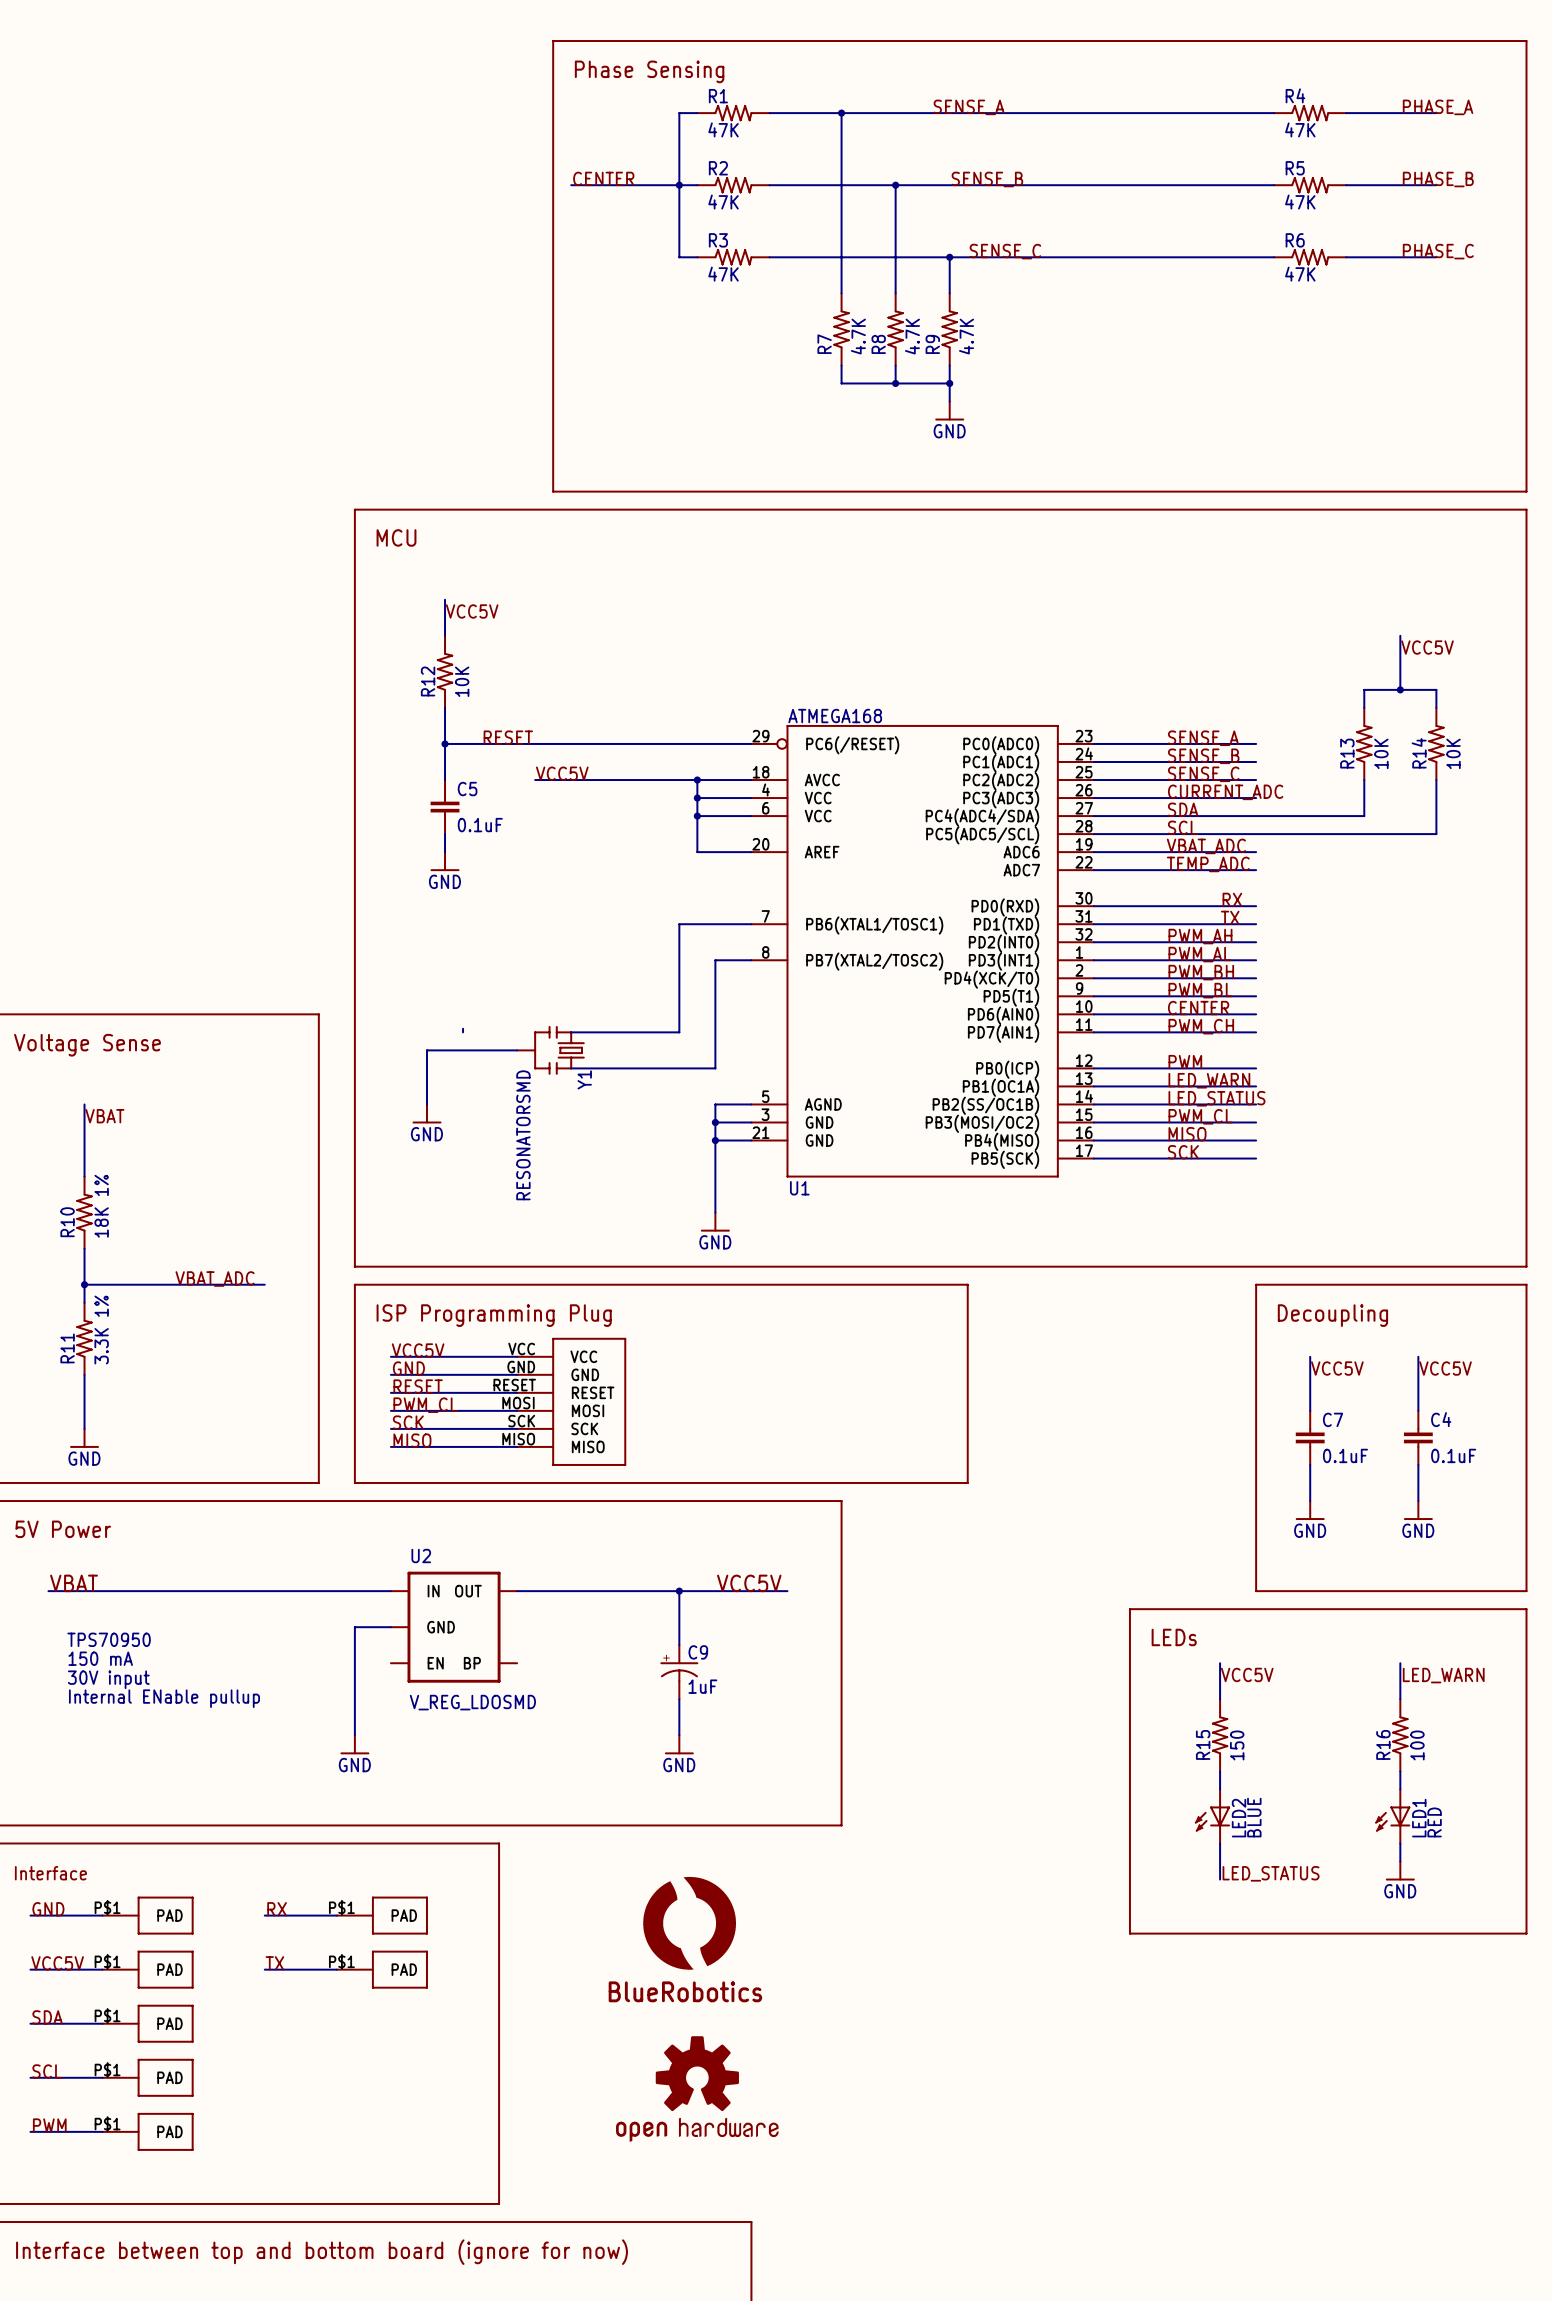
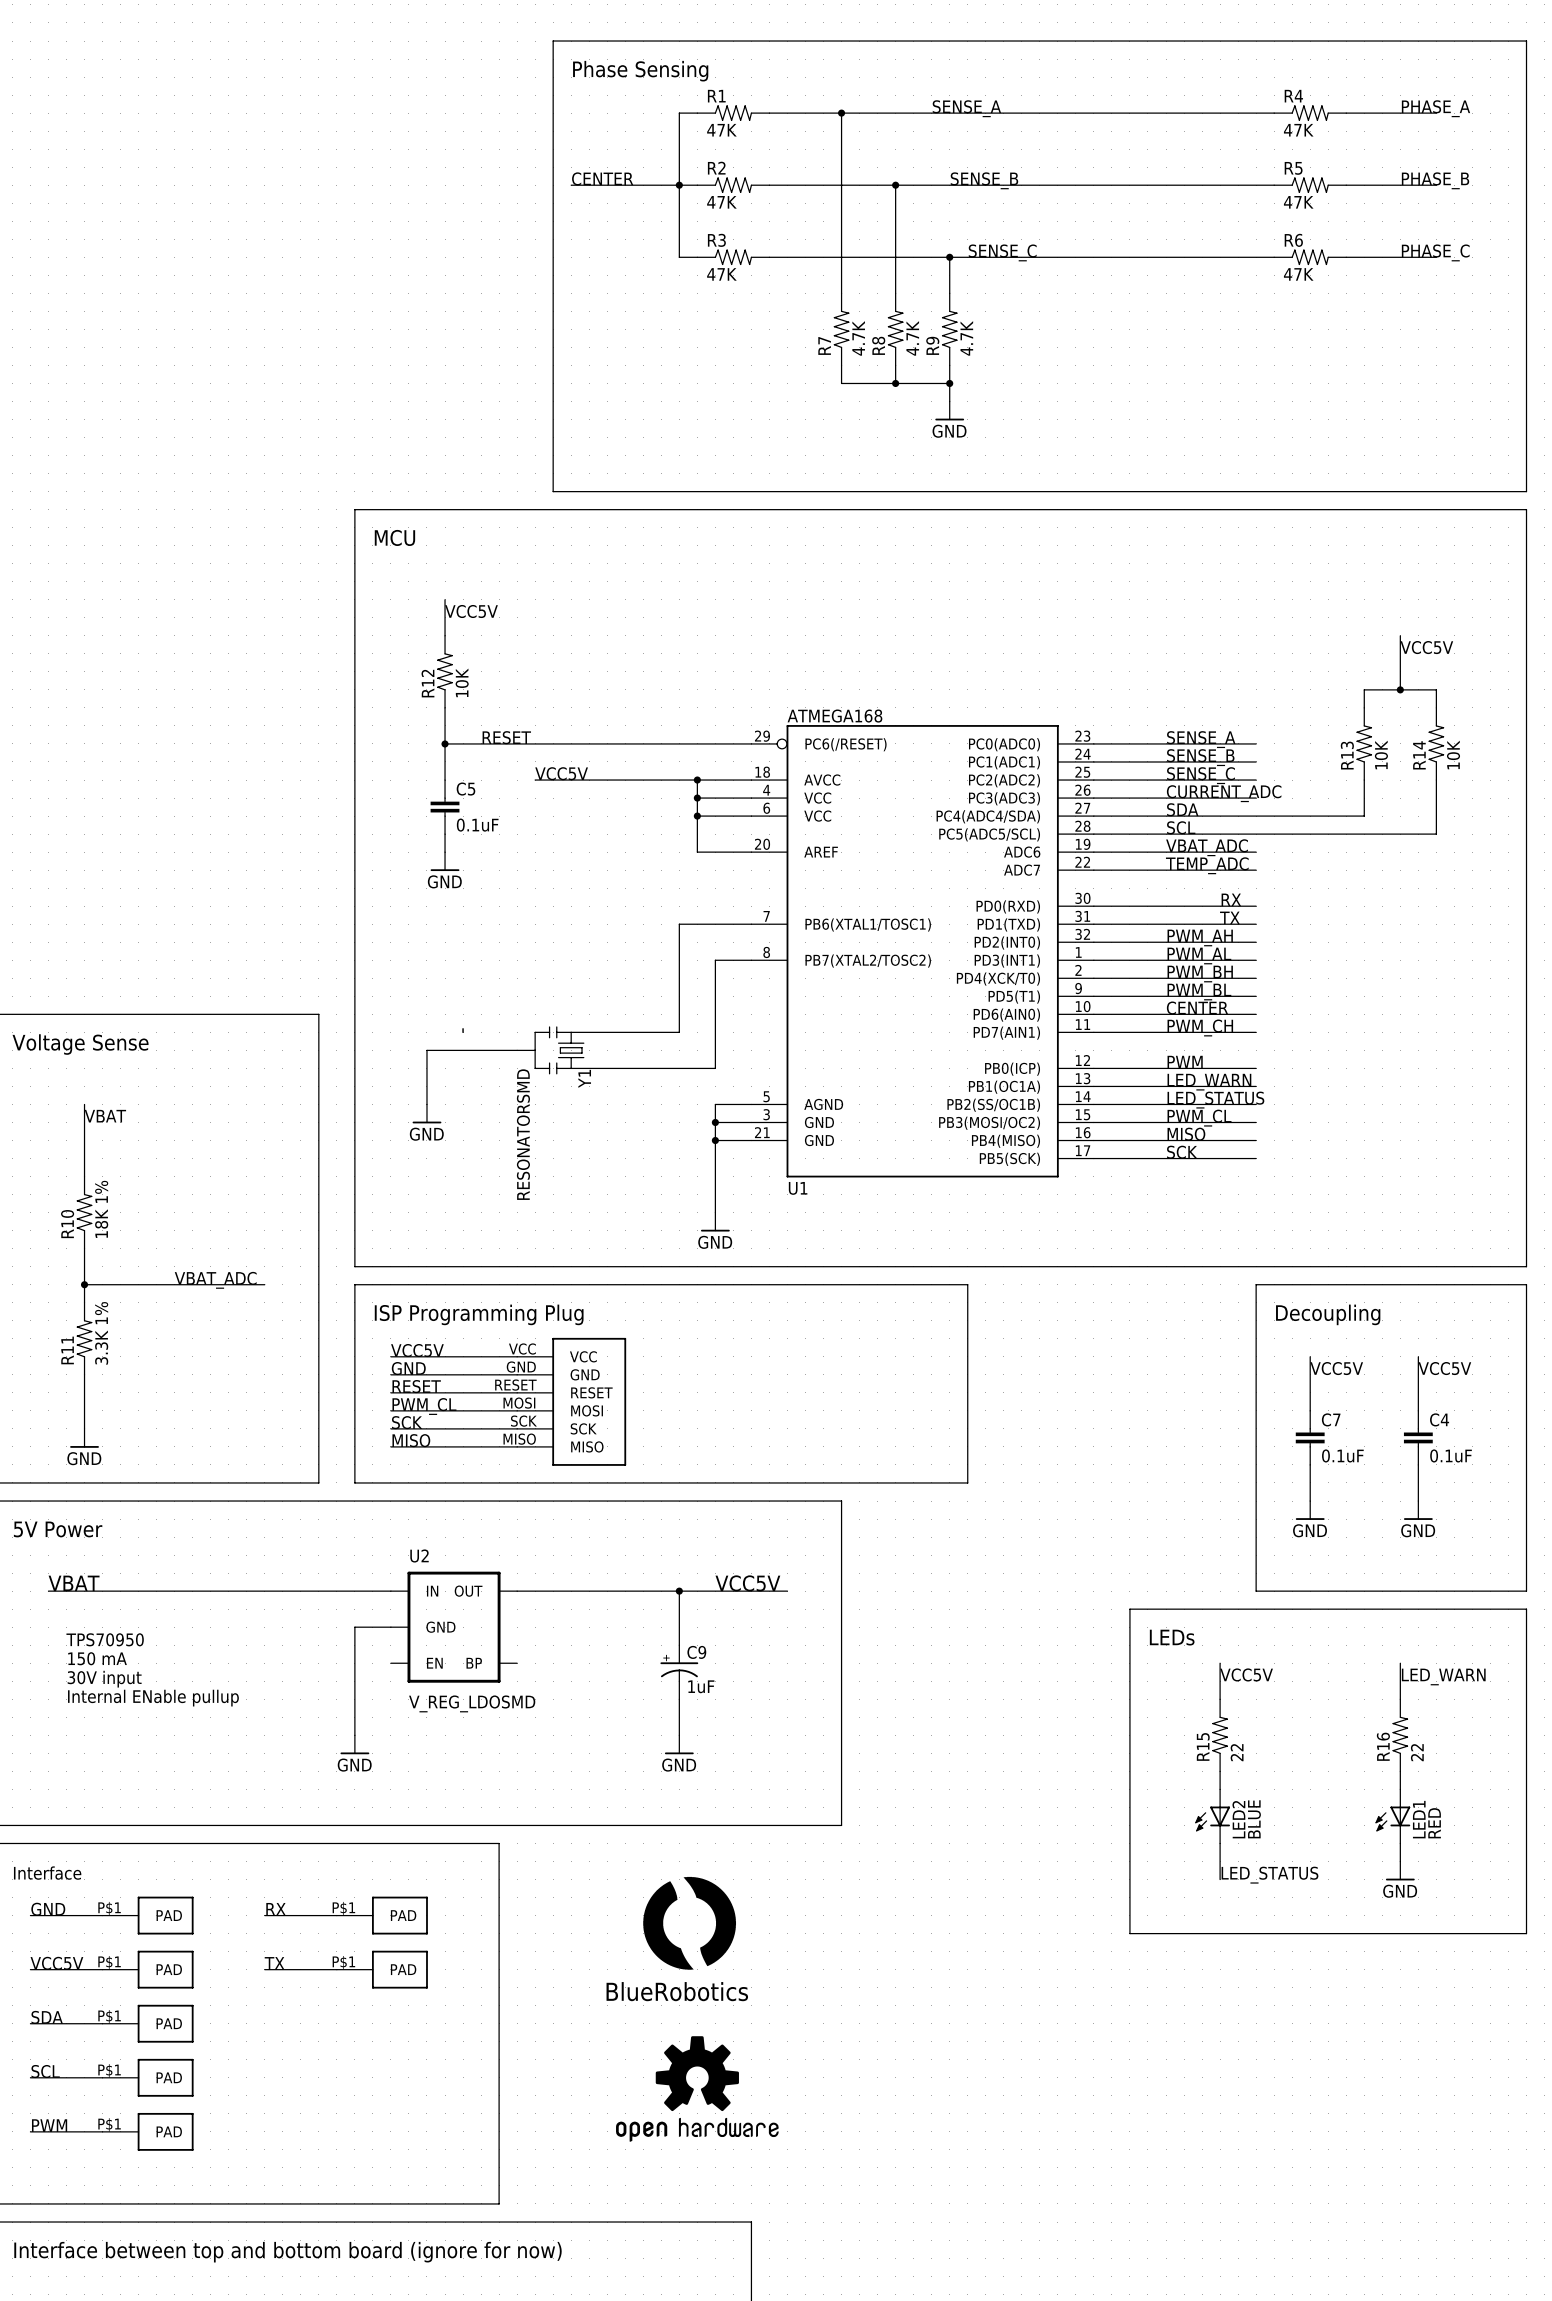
R15 value: 150 (1237, 1745) -> 22 (1237, 1752)
R16 value: 100 (1417, 1745) -> 22 (1417, 1752)

